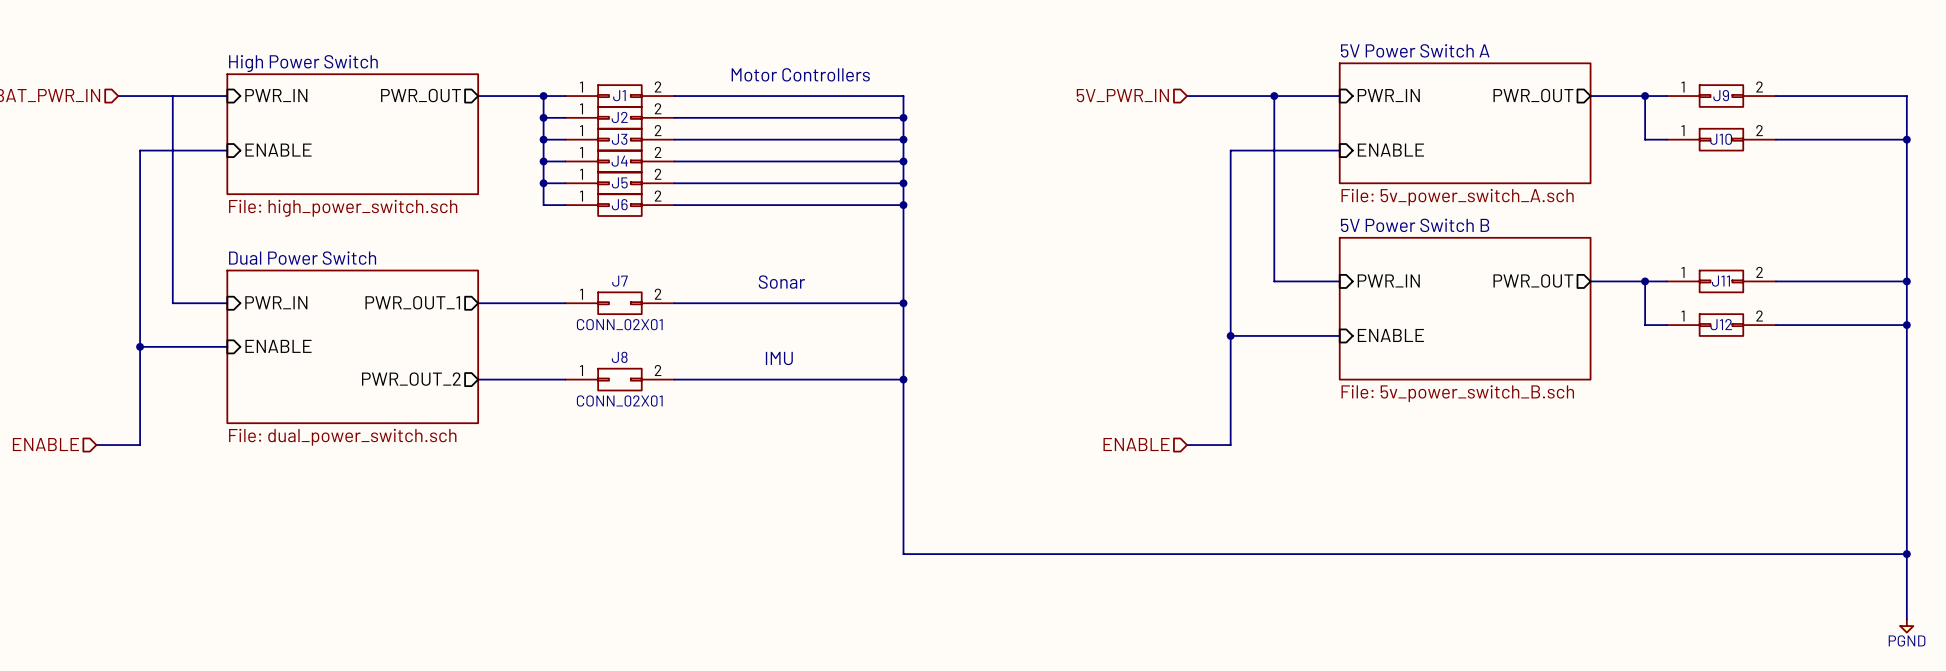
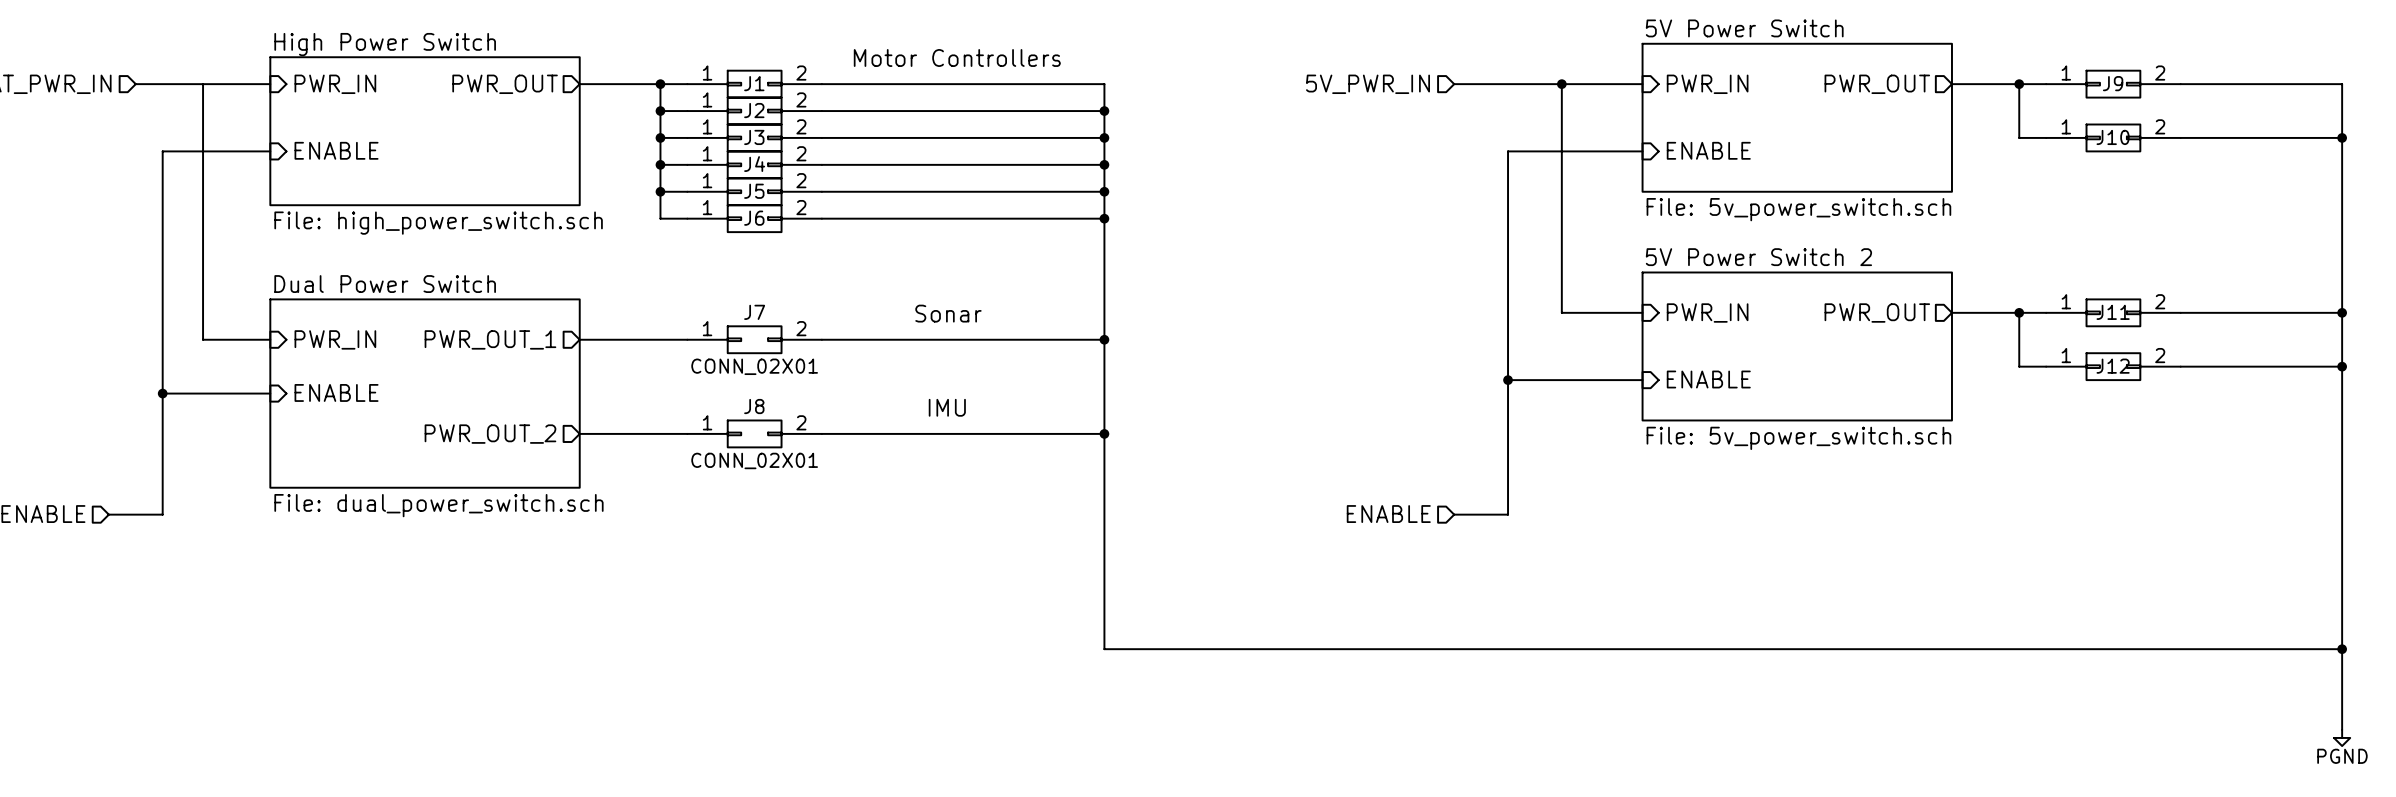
sheet 5V Power Switch A name: 5V Power Switch A (1415, 50) -> 5V Power Switch (1744, 28)
sheet 5V Power Switch A value: File: 5v_power_switch_A.sch (1457, 197) -> File: 5v_power_switch.sch (1798, 209)
sheet 5V Power Switch B: File: 5v_power_switch_B.sch (1465, 308) -> none
sheet 5V Power Switch 2: none -> File: 5v_power_switch.sch (1797, 346)

